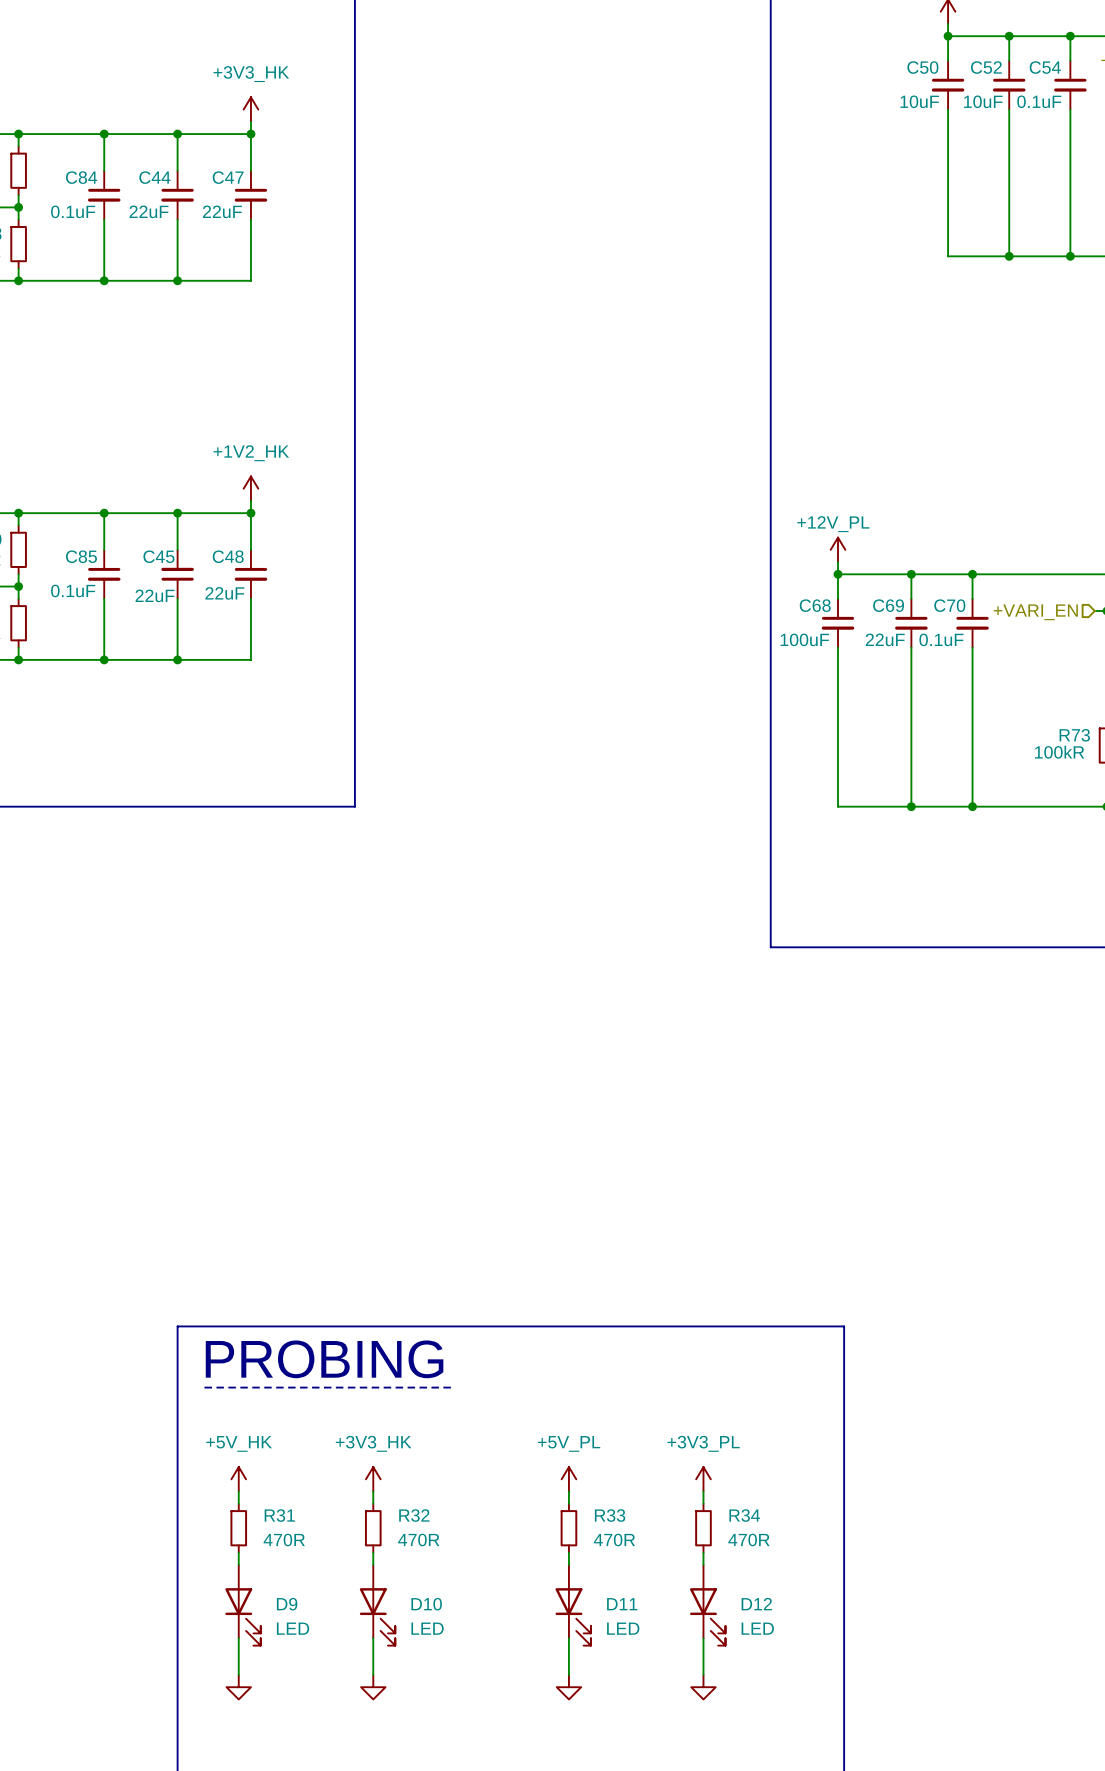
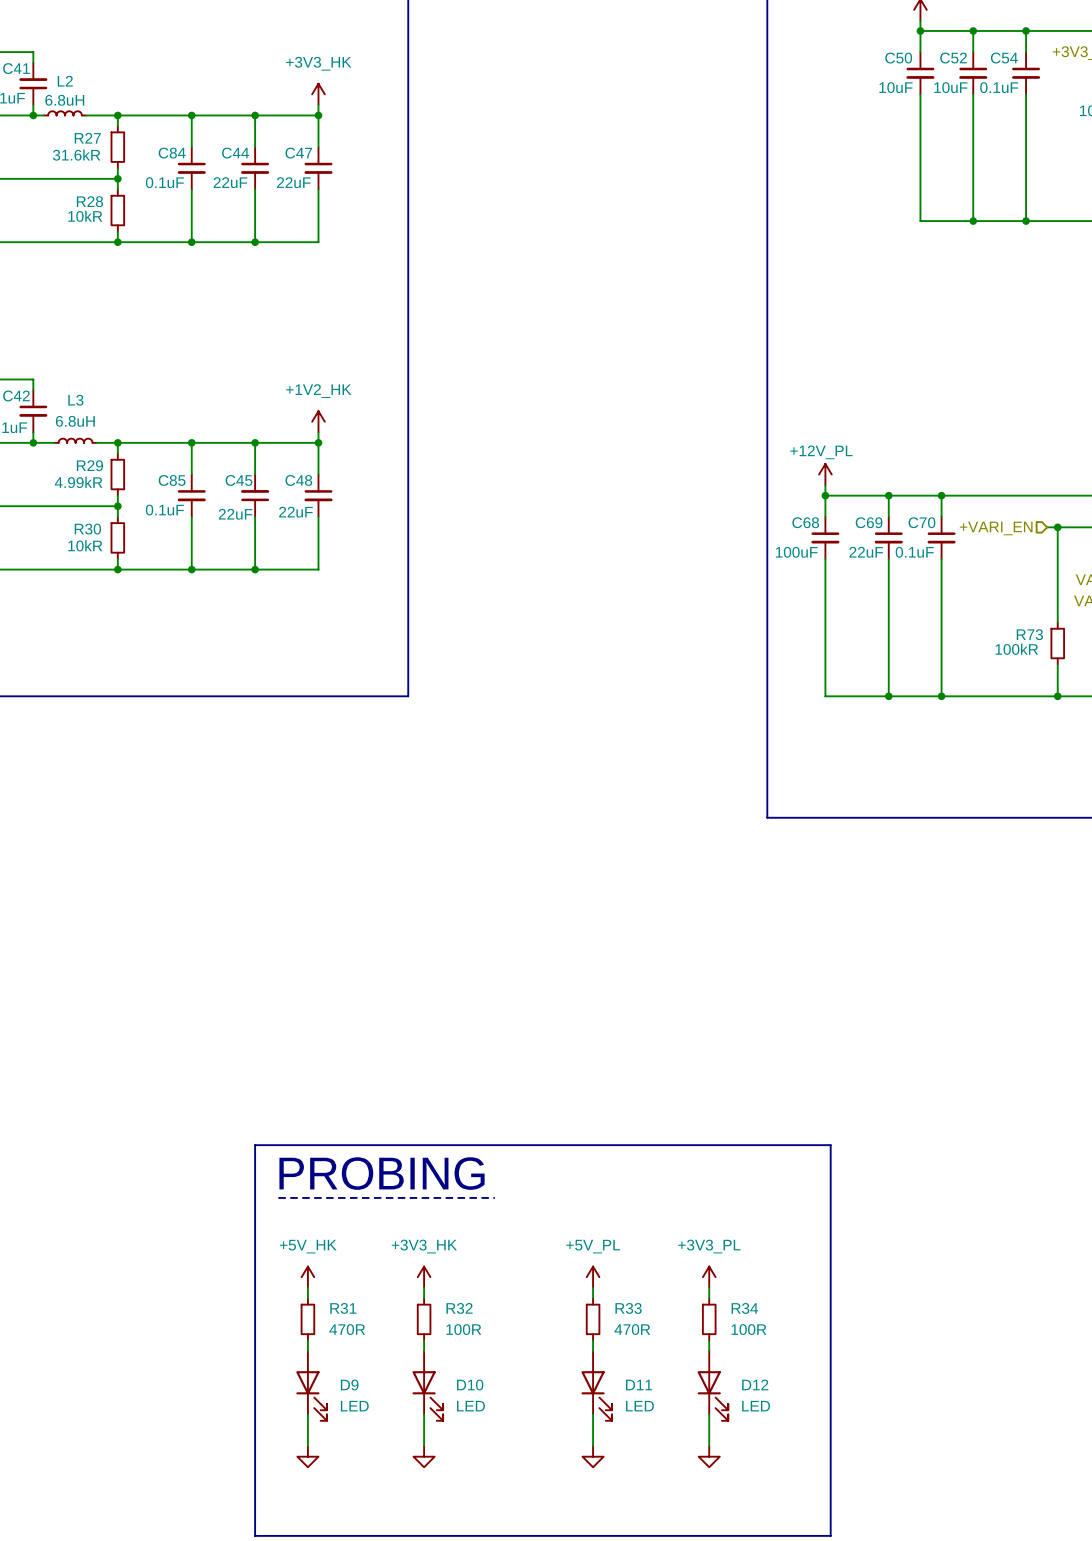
R32 value: 470R (418, 1539) -> 100R (463, 1329)
R34 value: 470R (748, 1539) -> 100R (748, 1329)

